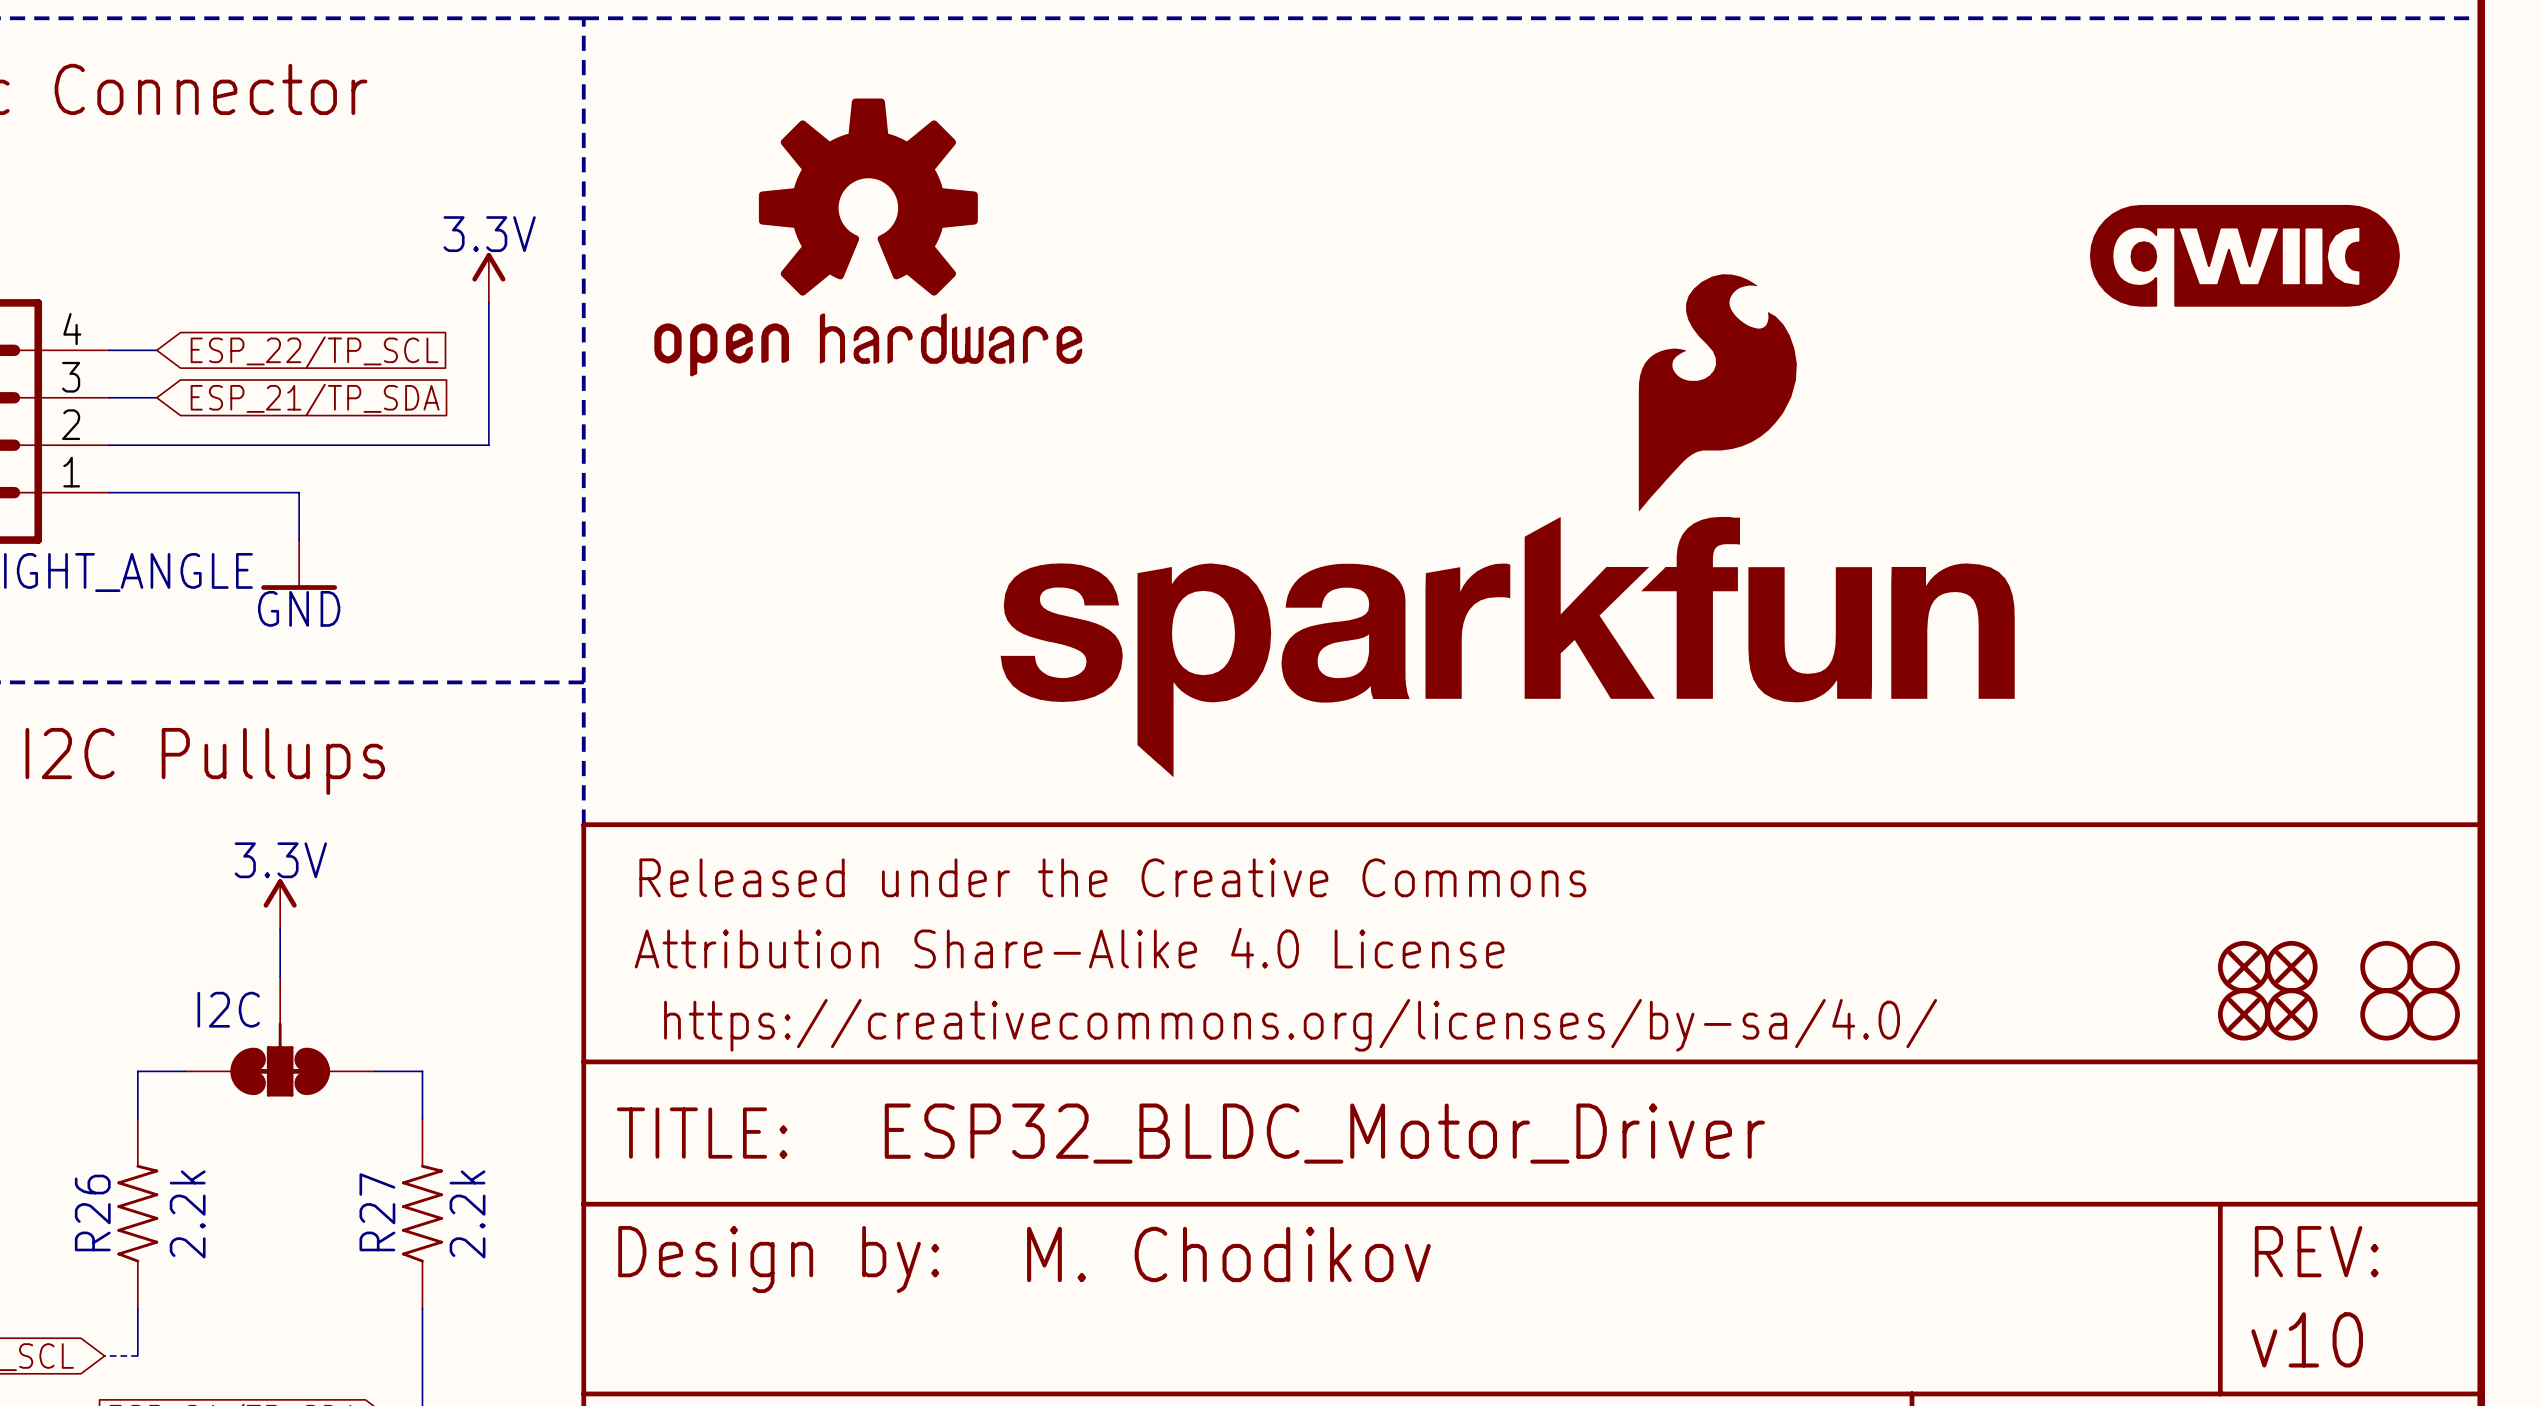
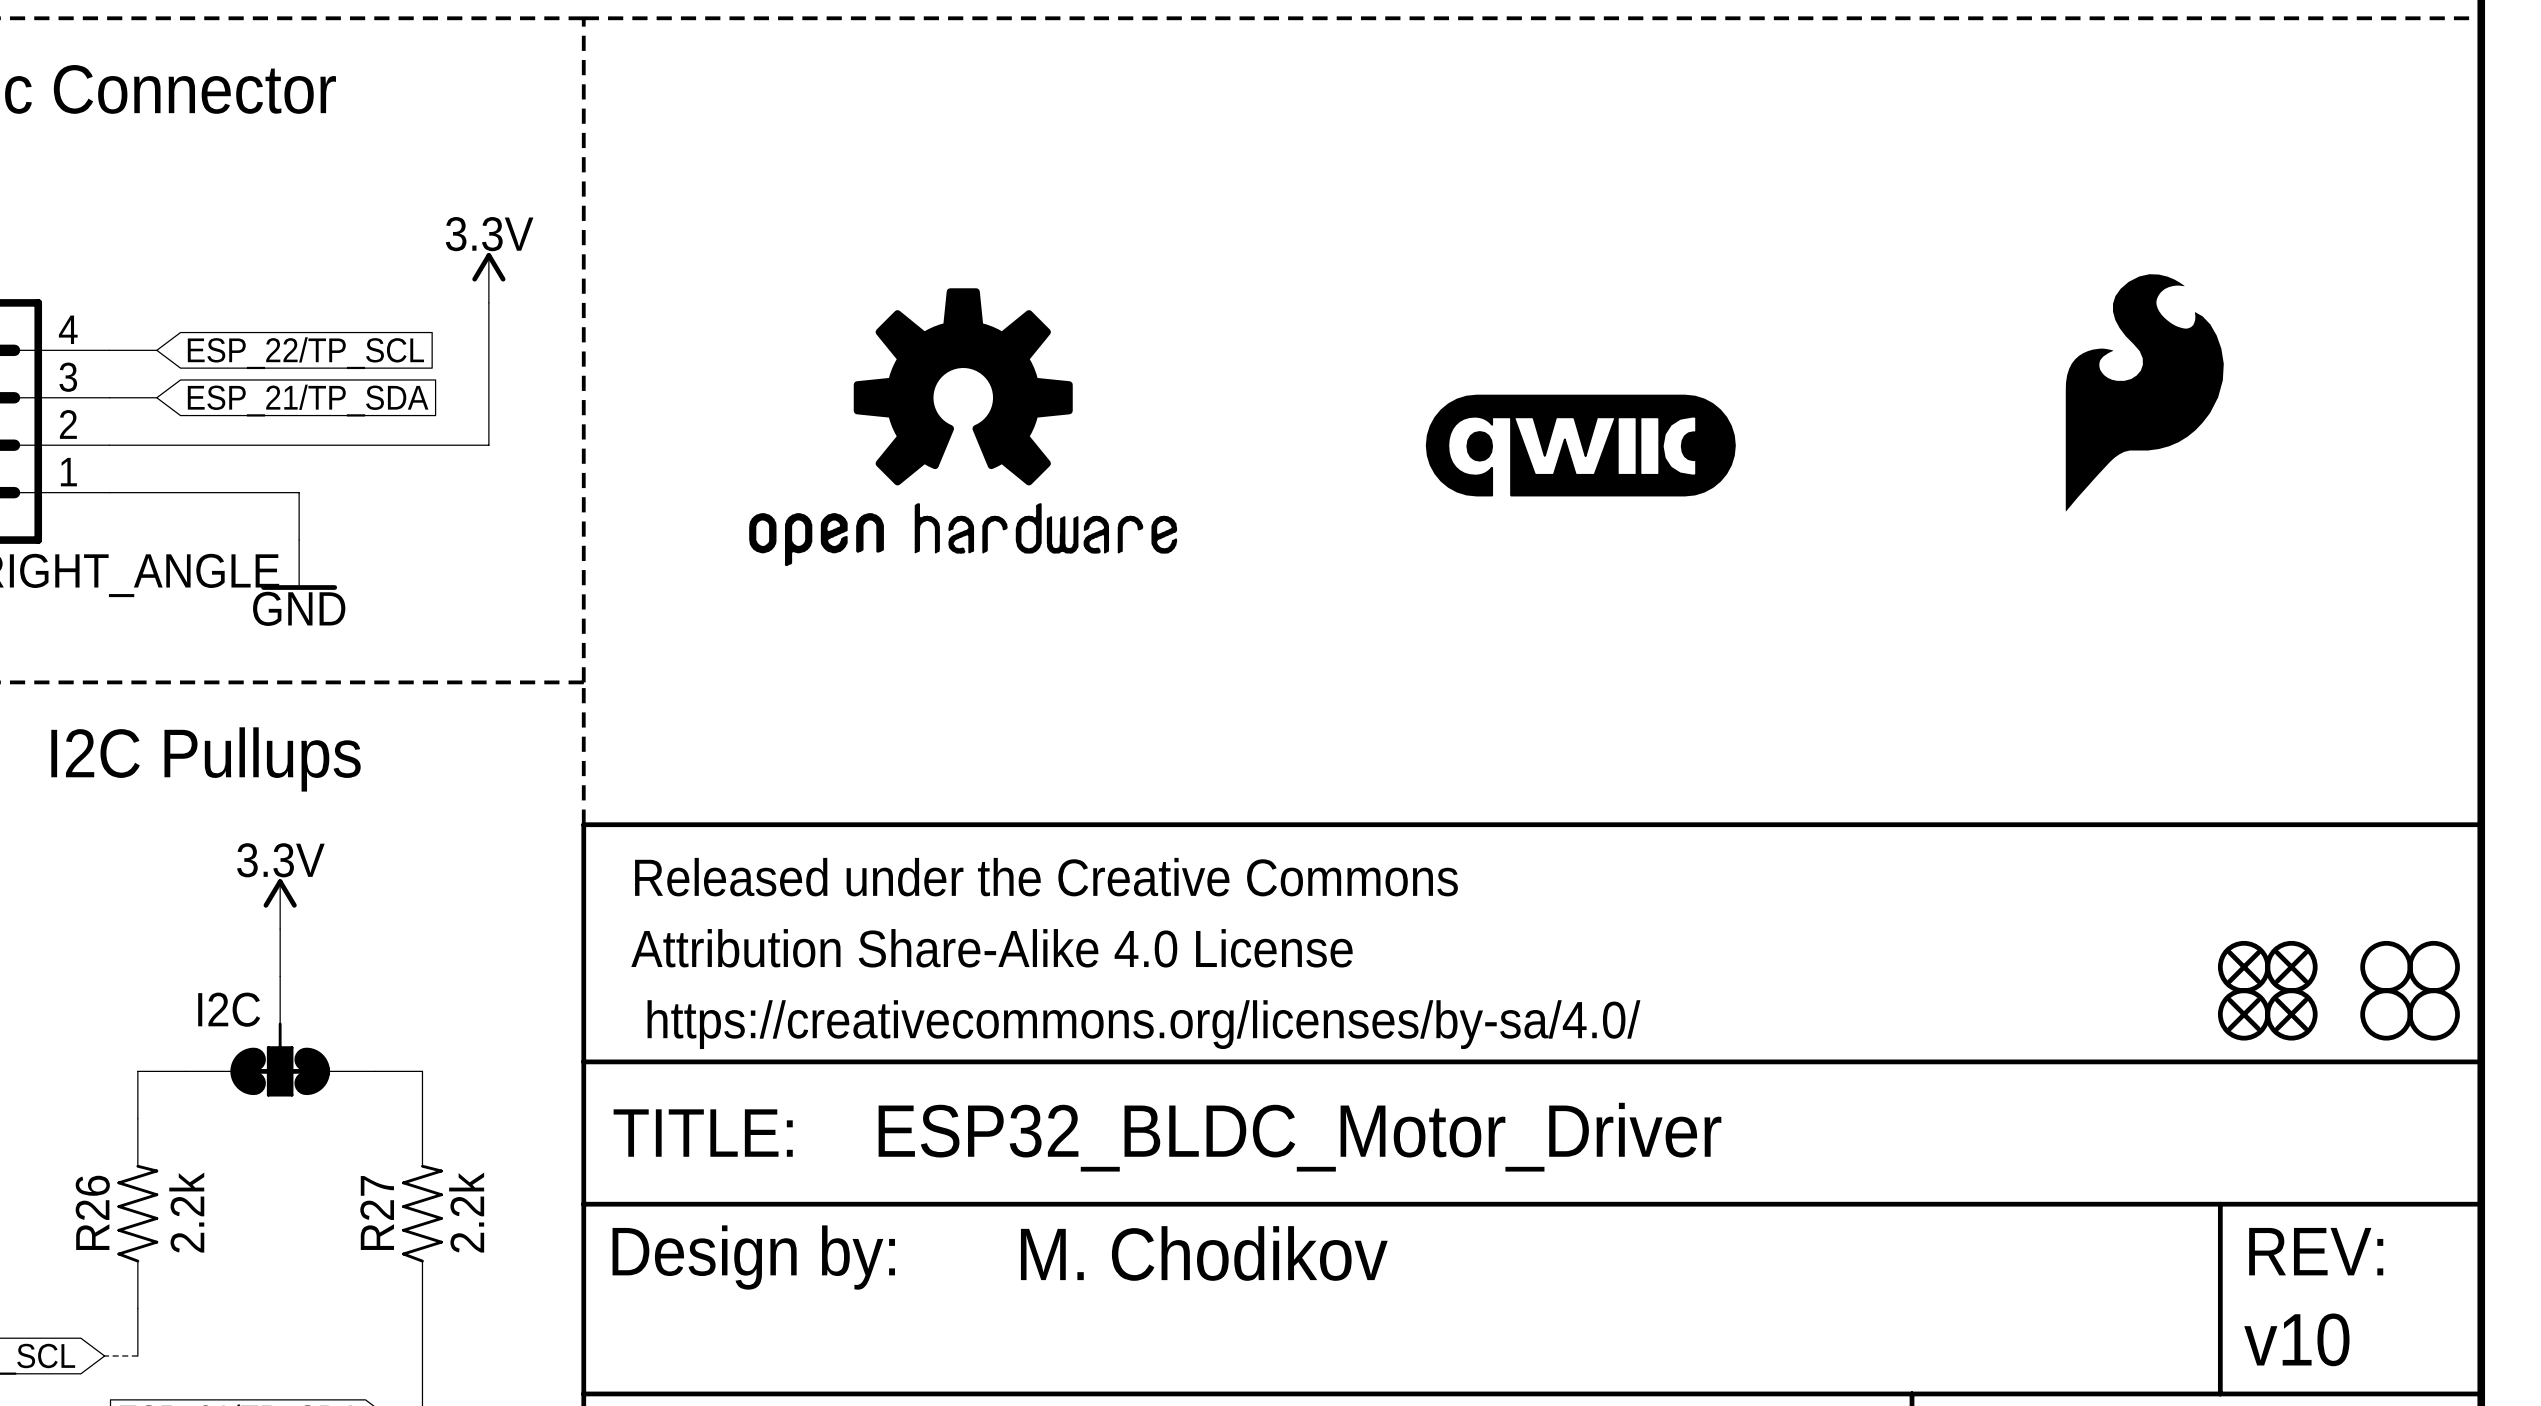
part position: (868, 237) -> (963, 427)
part: (2244, 255) -> none
part position: (1717, 392) -> (2144, 392)
part: none -> (1580, 445)
part: (1507, 647) -> none

